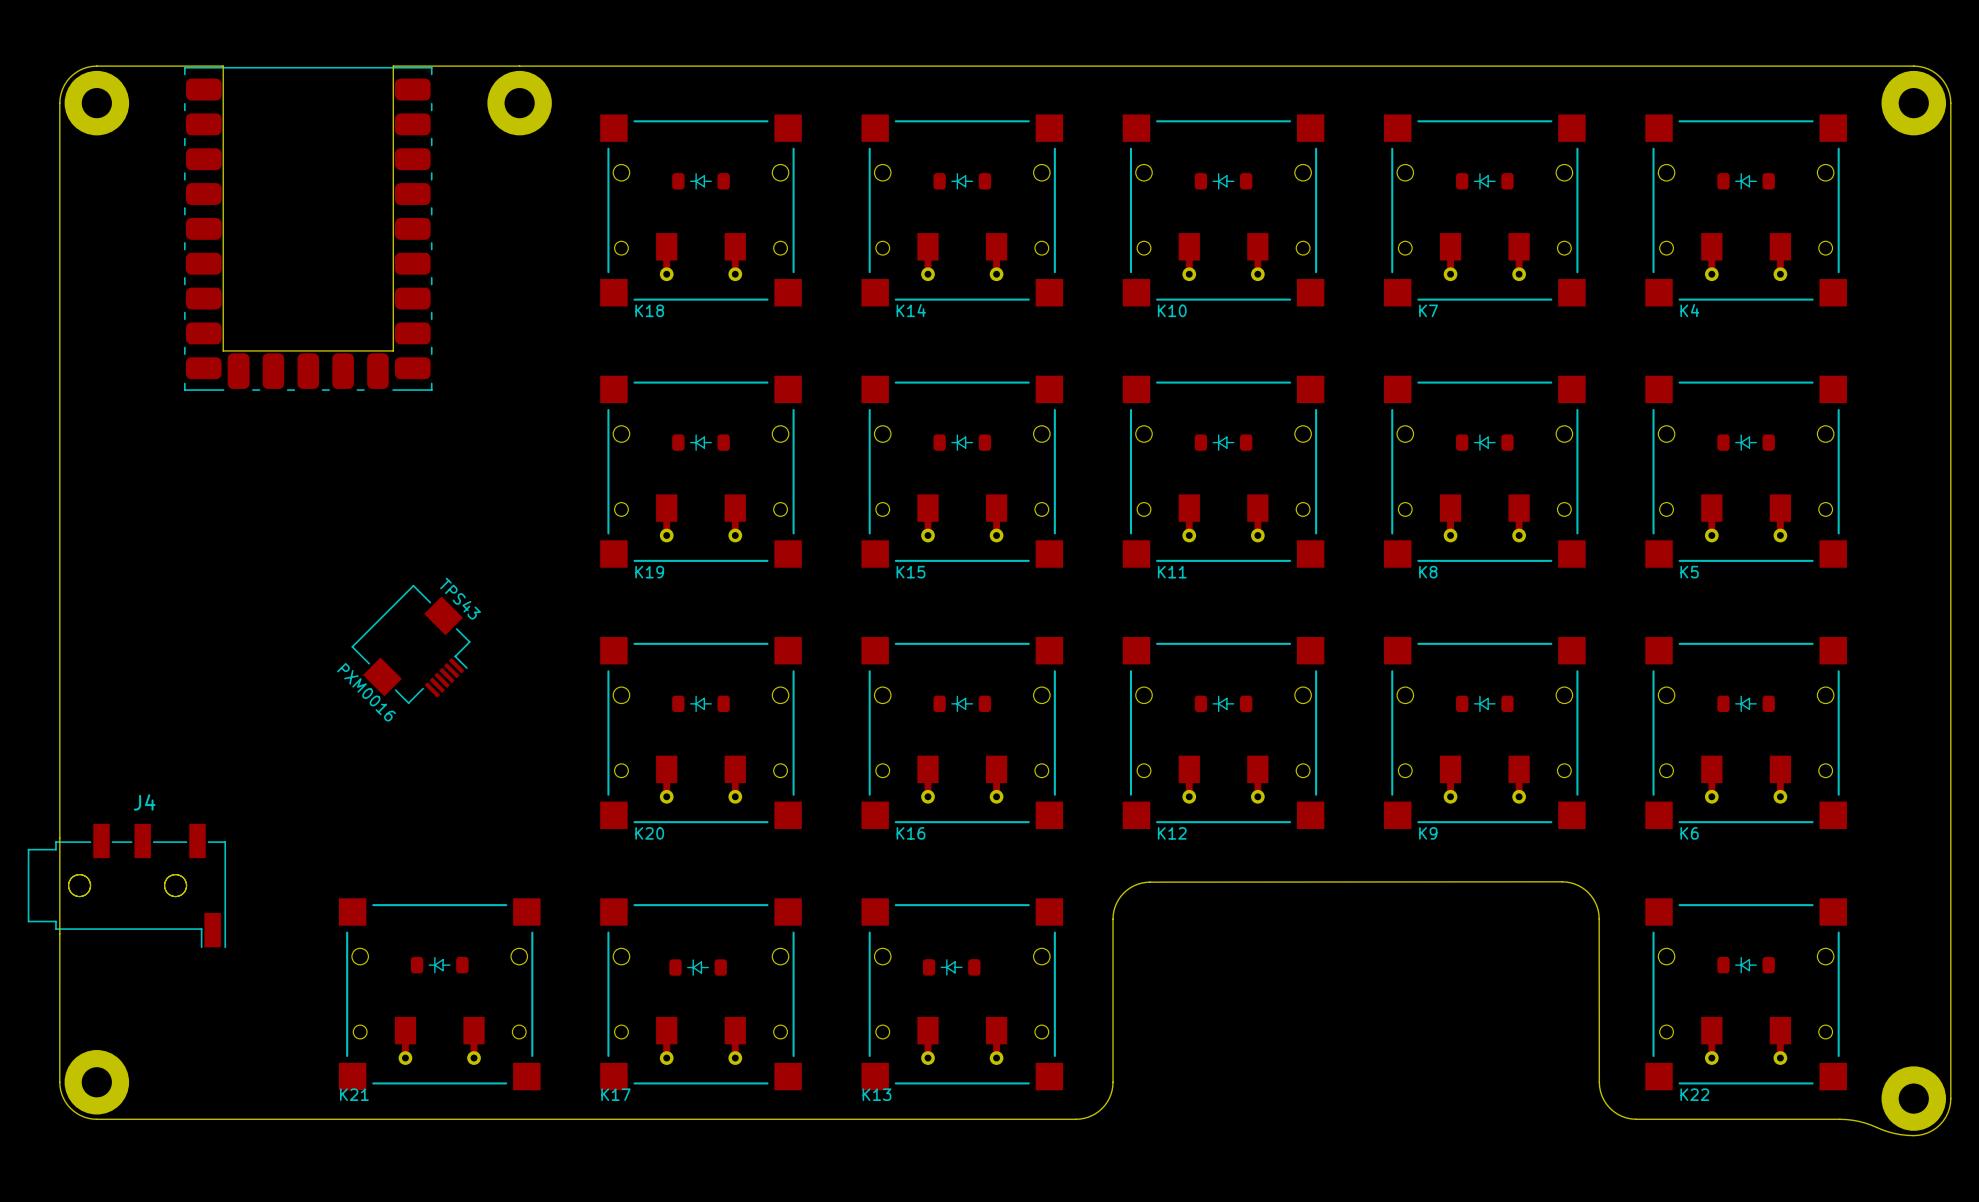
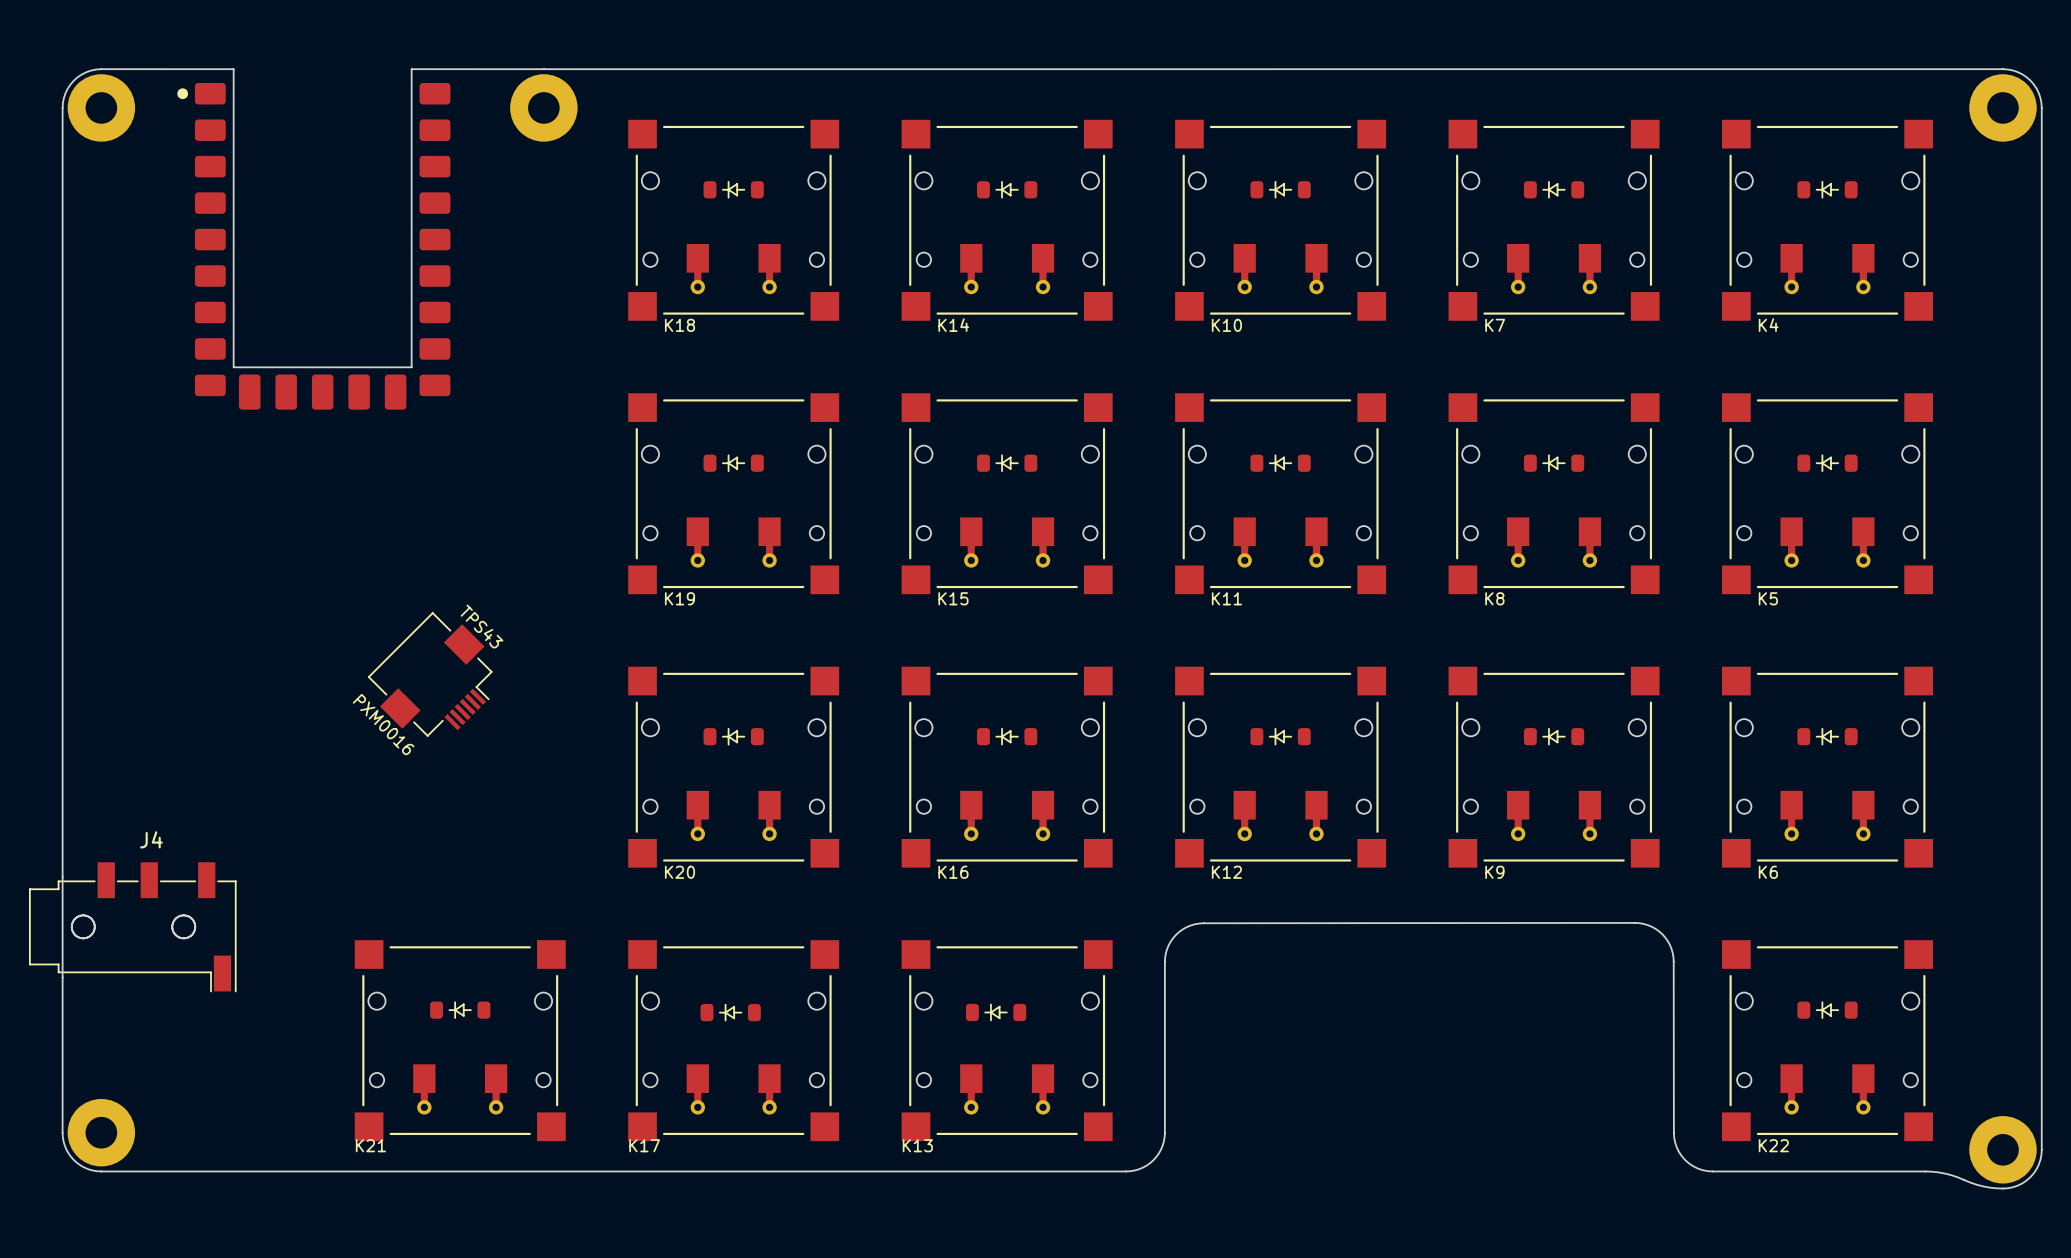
part footprint: [184, 66, 433, 391] -> [177, 82, 451, 410]

